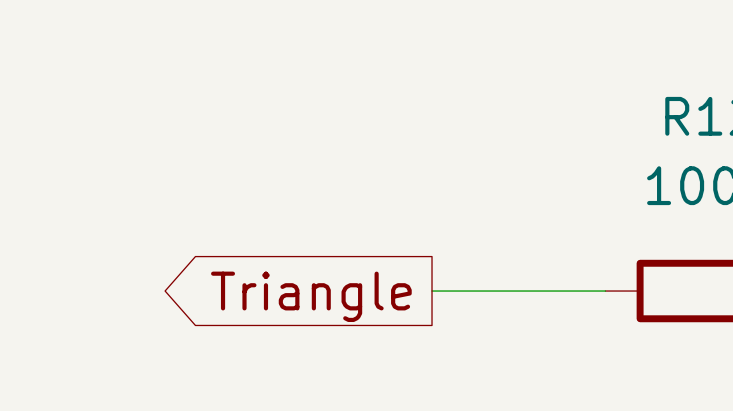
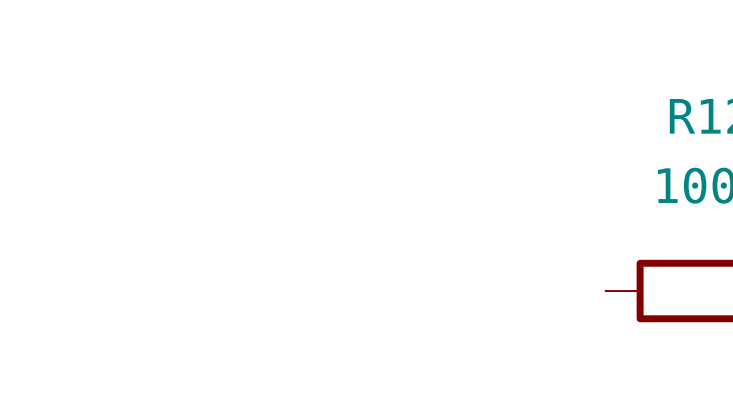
wire: (432, 291) (605, 291) -> none
global label: Triangle (311, 296) -> none

